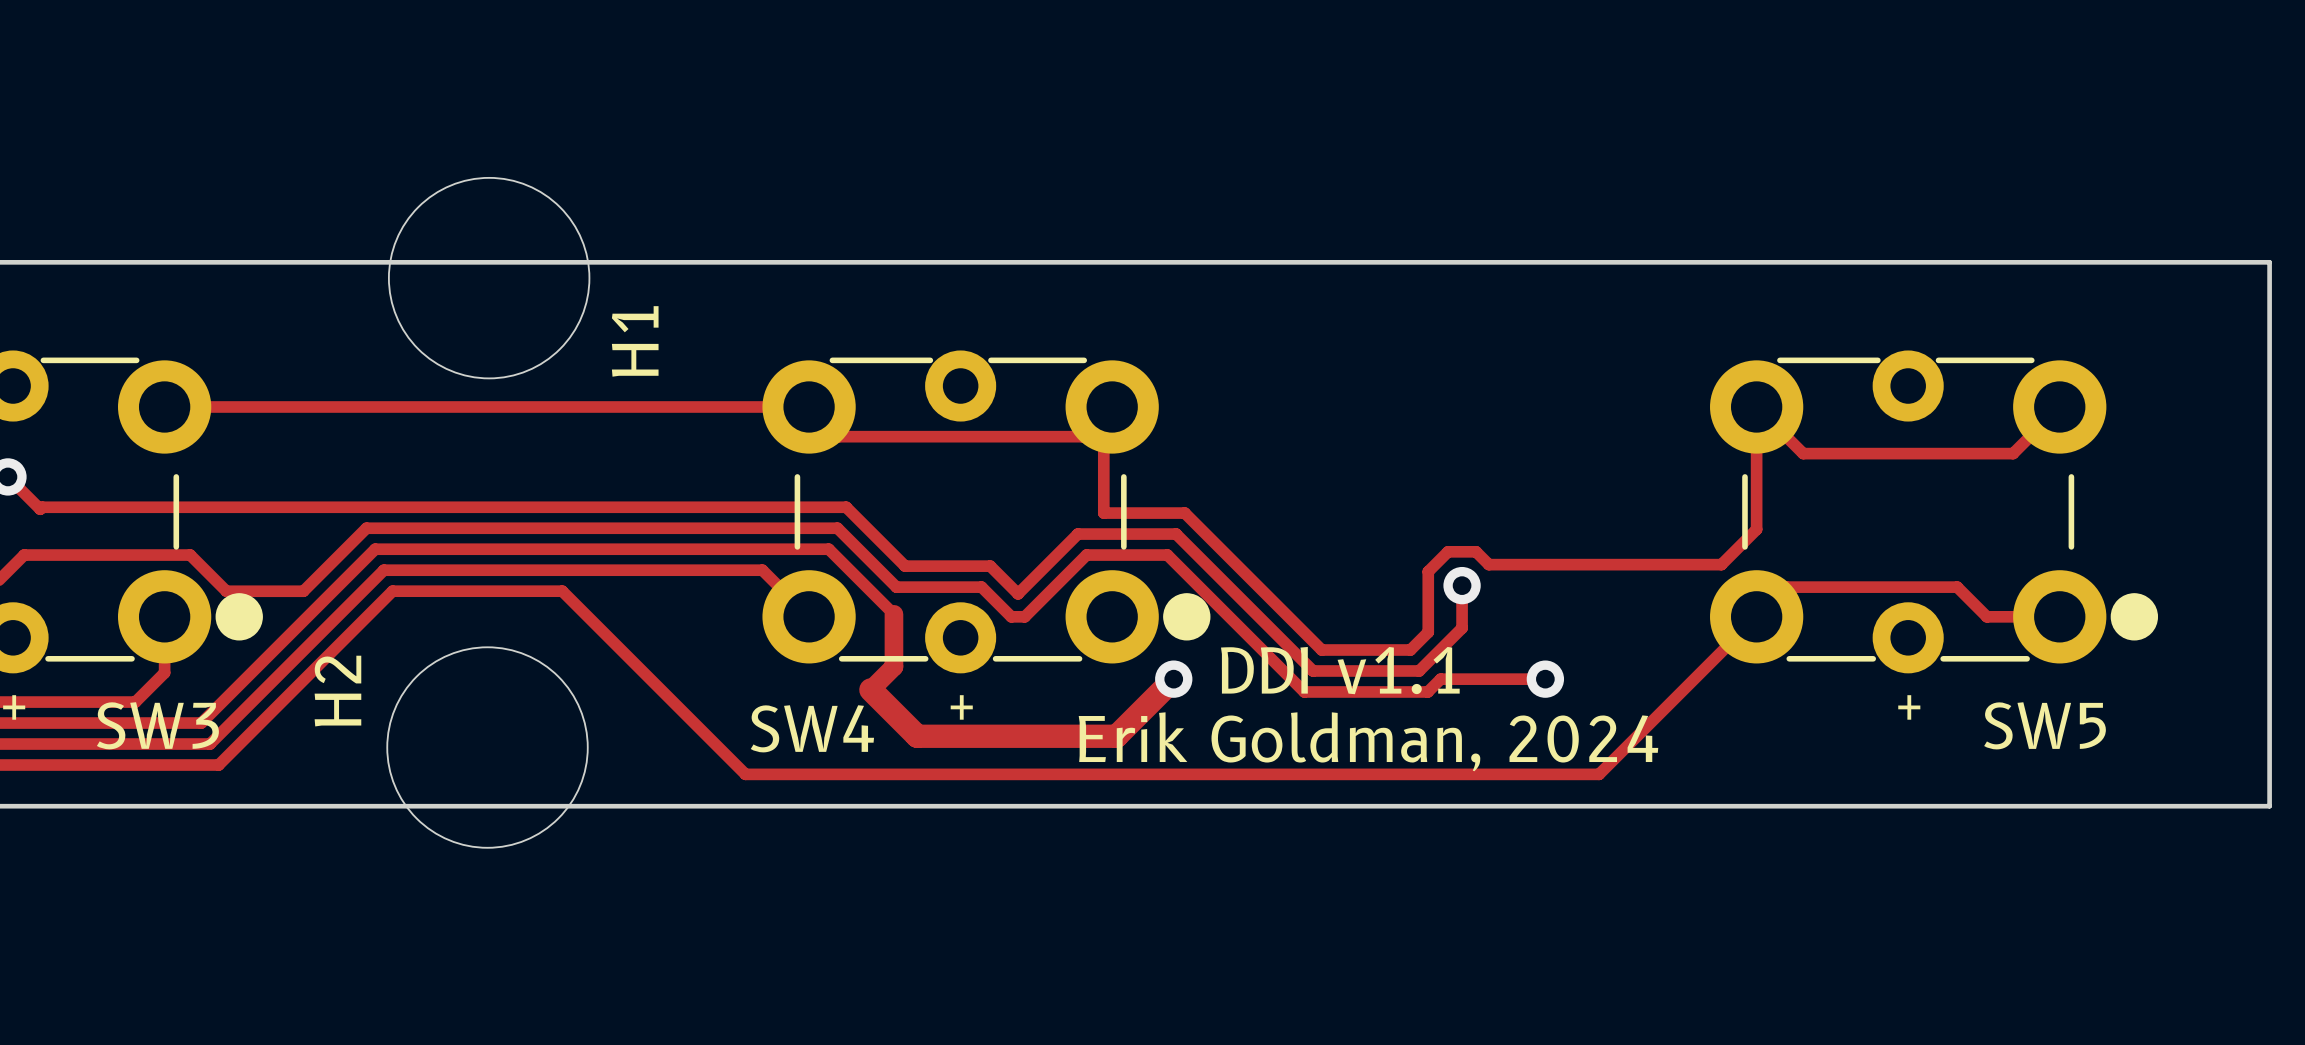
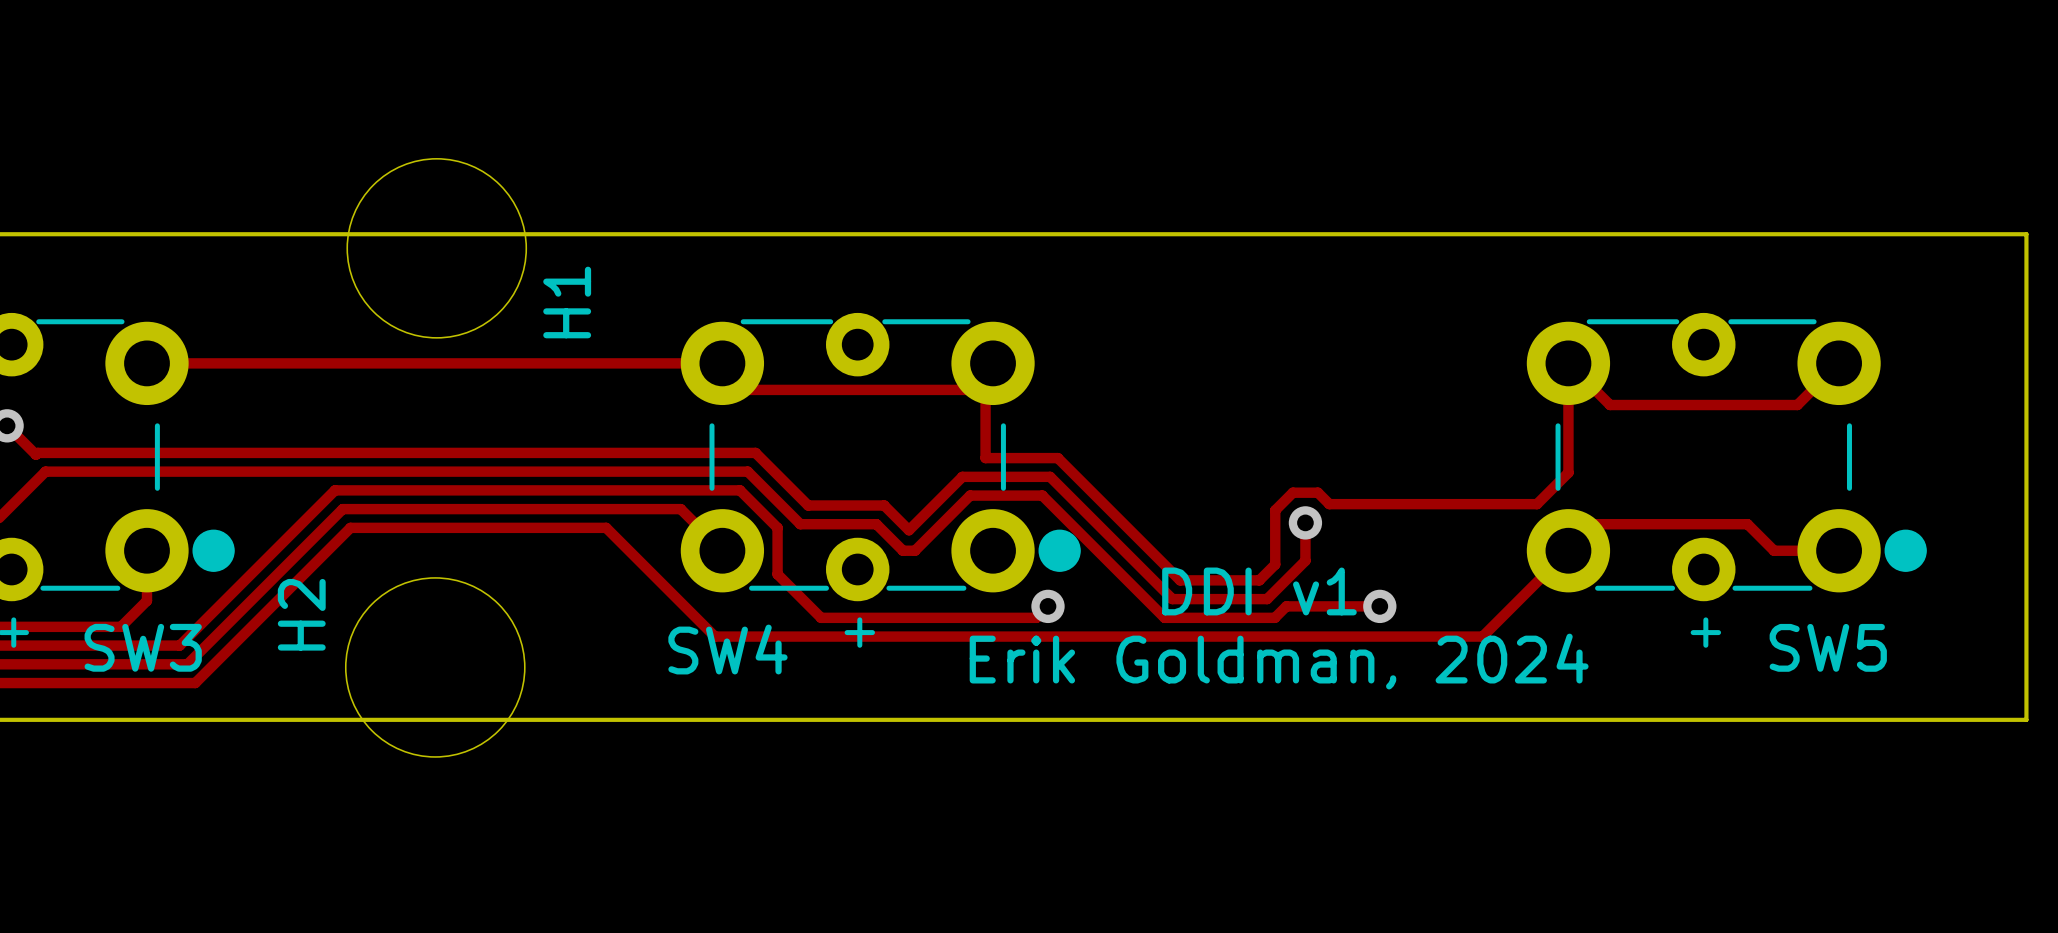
track: (366, 528) (303, 591) (226, 591) (190, 555) (24, 555) -> (327, 471) (45, 471) (21, 495)
track: (562, 591) (745, 774) (1599, 774) (1660, 712) -> (502, 527) (606, 527) (714, 636) (1482, 636)
track: (870, 591) (893, 614) (893, 666) (870, 689) (917, 736) (1116, 736) (1160, 691) -> (777, 527) (777, 574) (821, 617) (1036, 617)
text: DDI v1.1 (1340, 670) -> DDI v1 (1259, 591)

